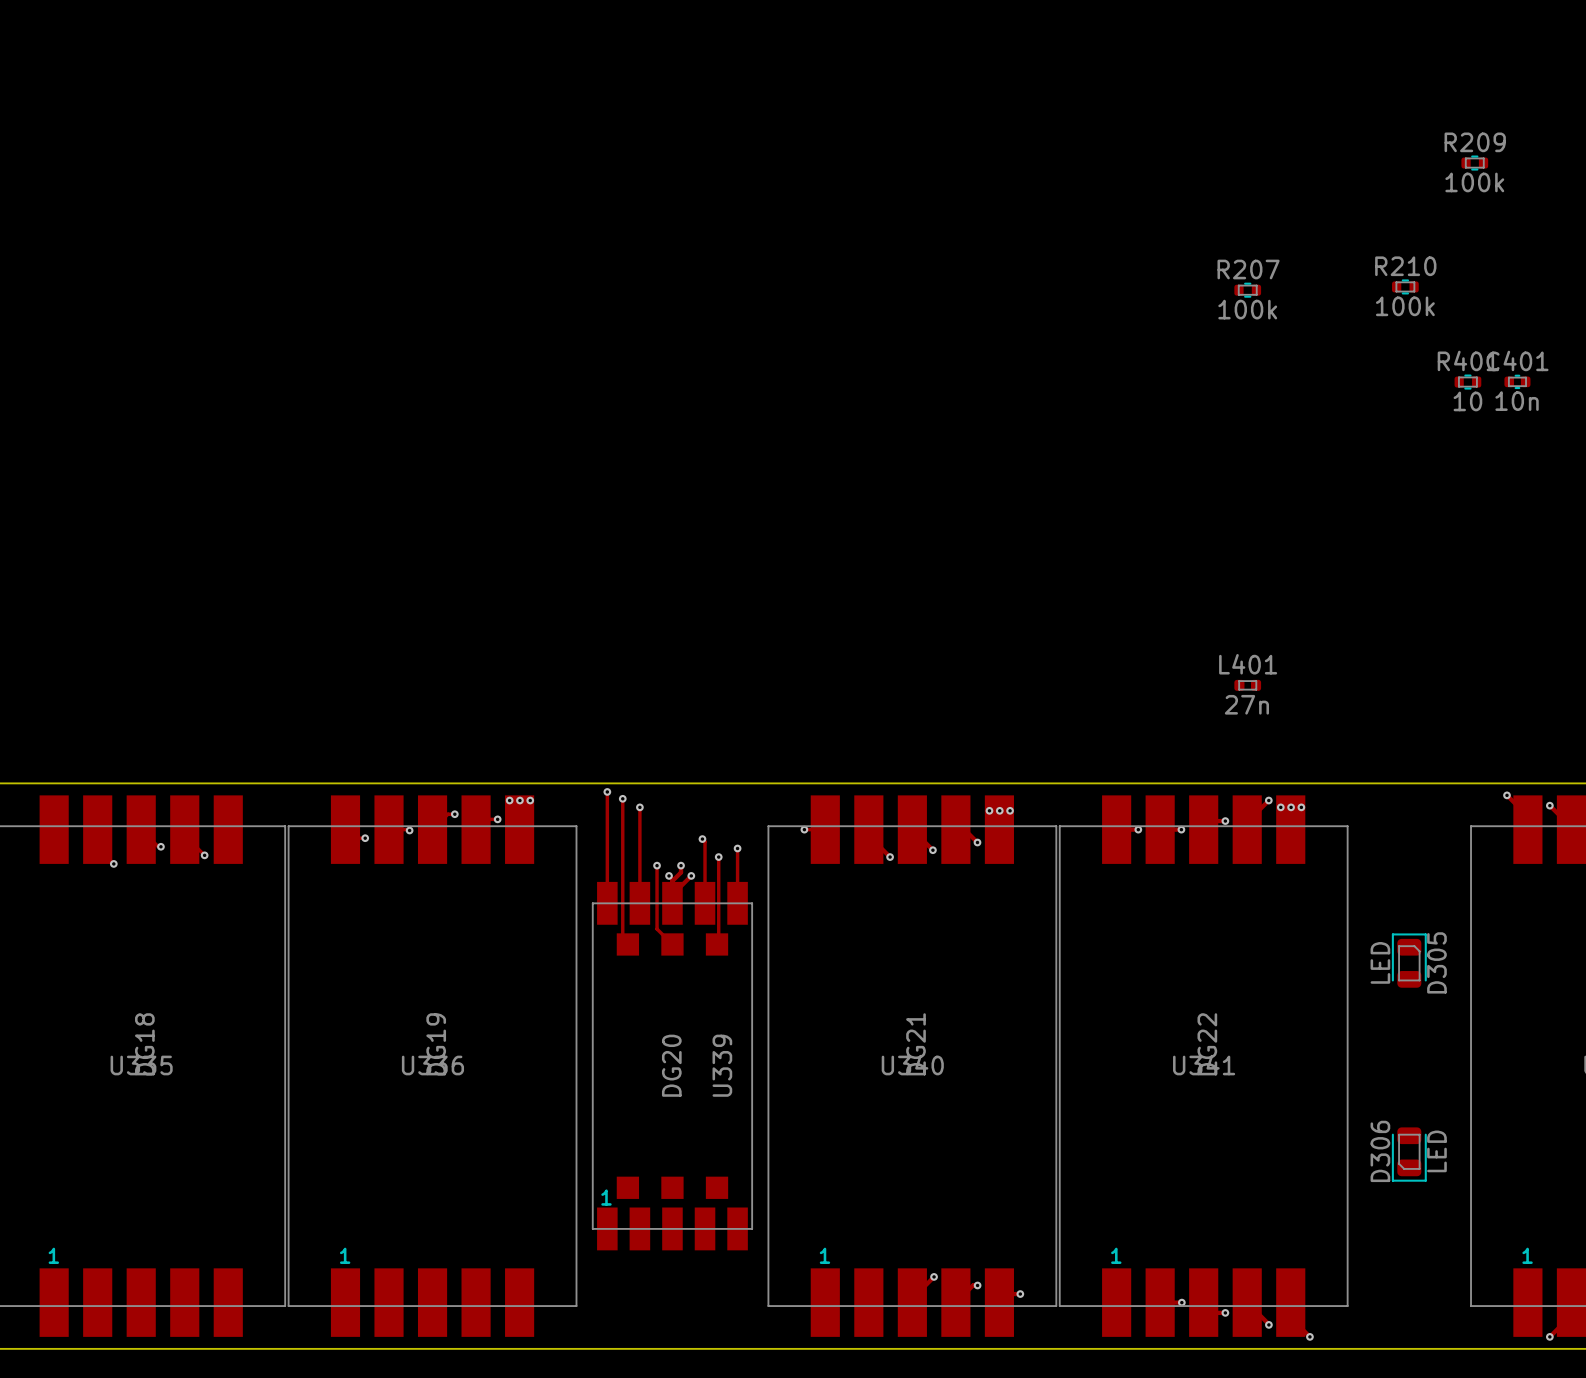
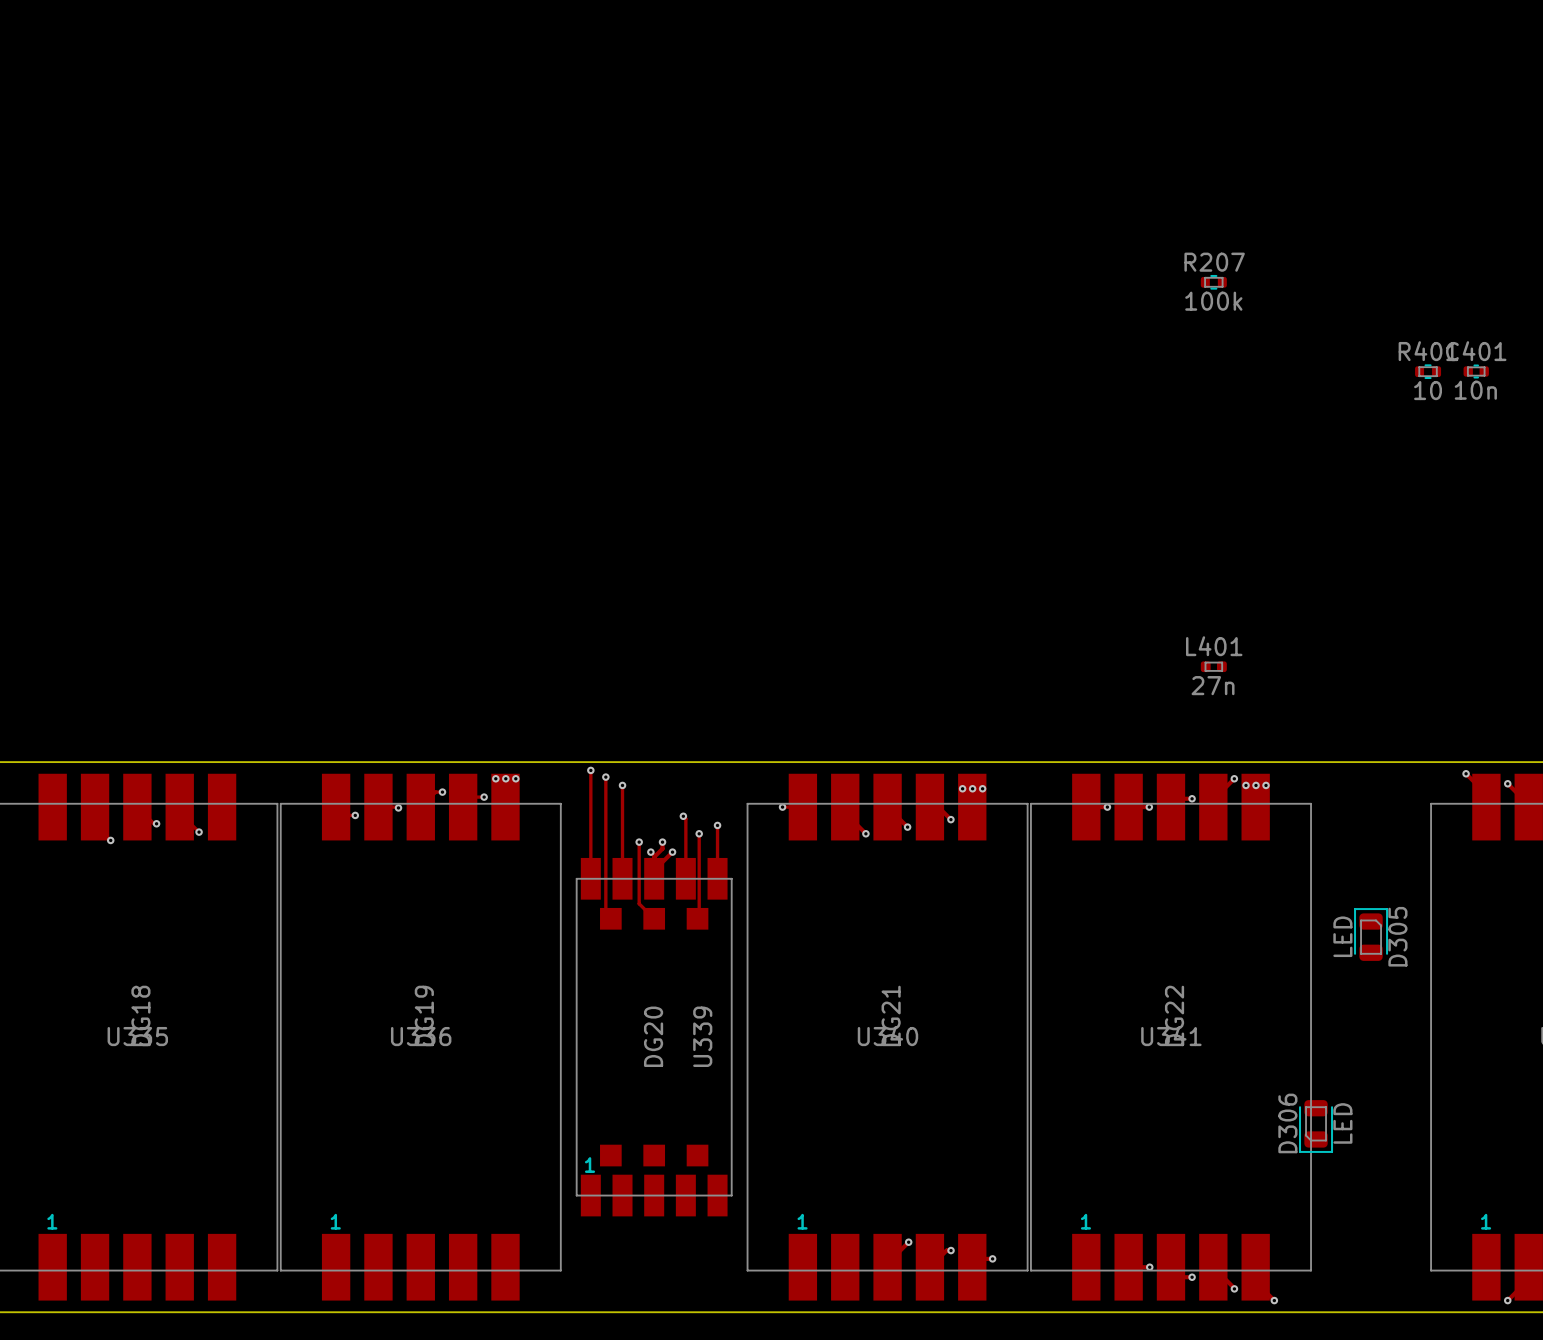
R209: 100k (1474, 163) -> none
R210: 100k (1405, 286) -> none
D306 position: (1409, 1154) -> (1316, 1126)

